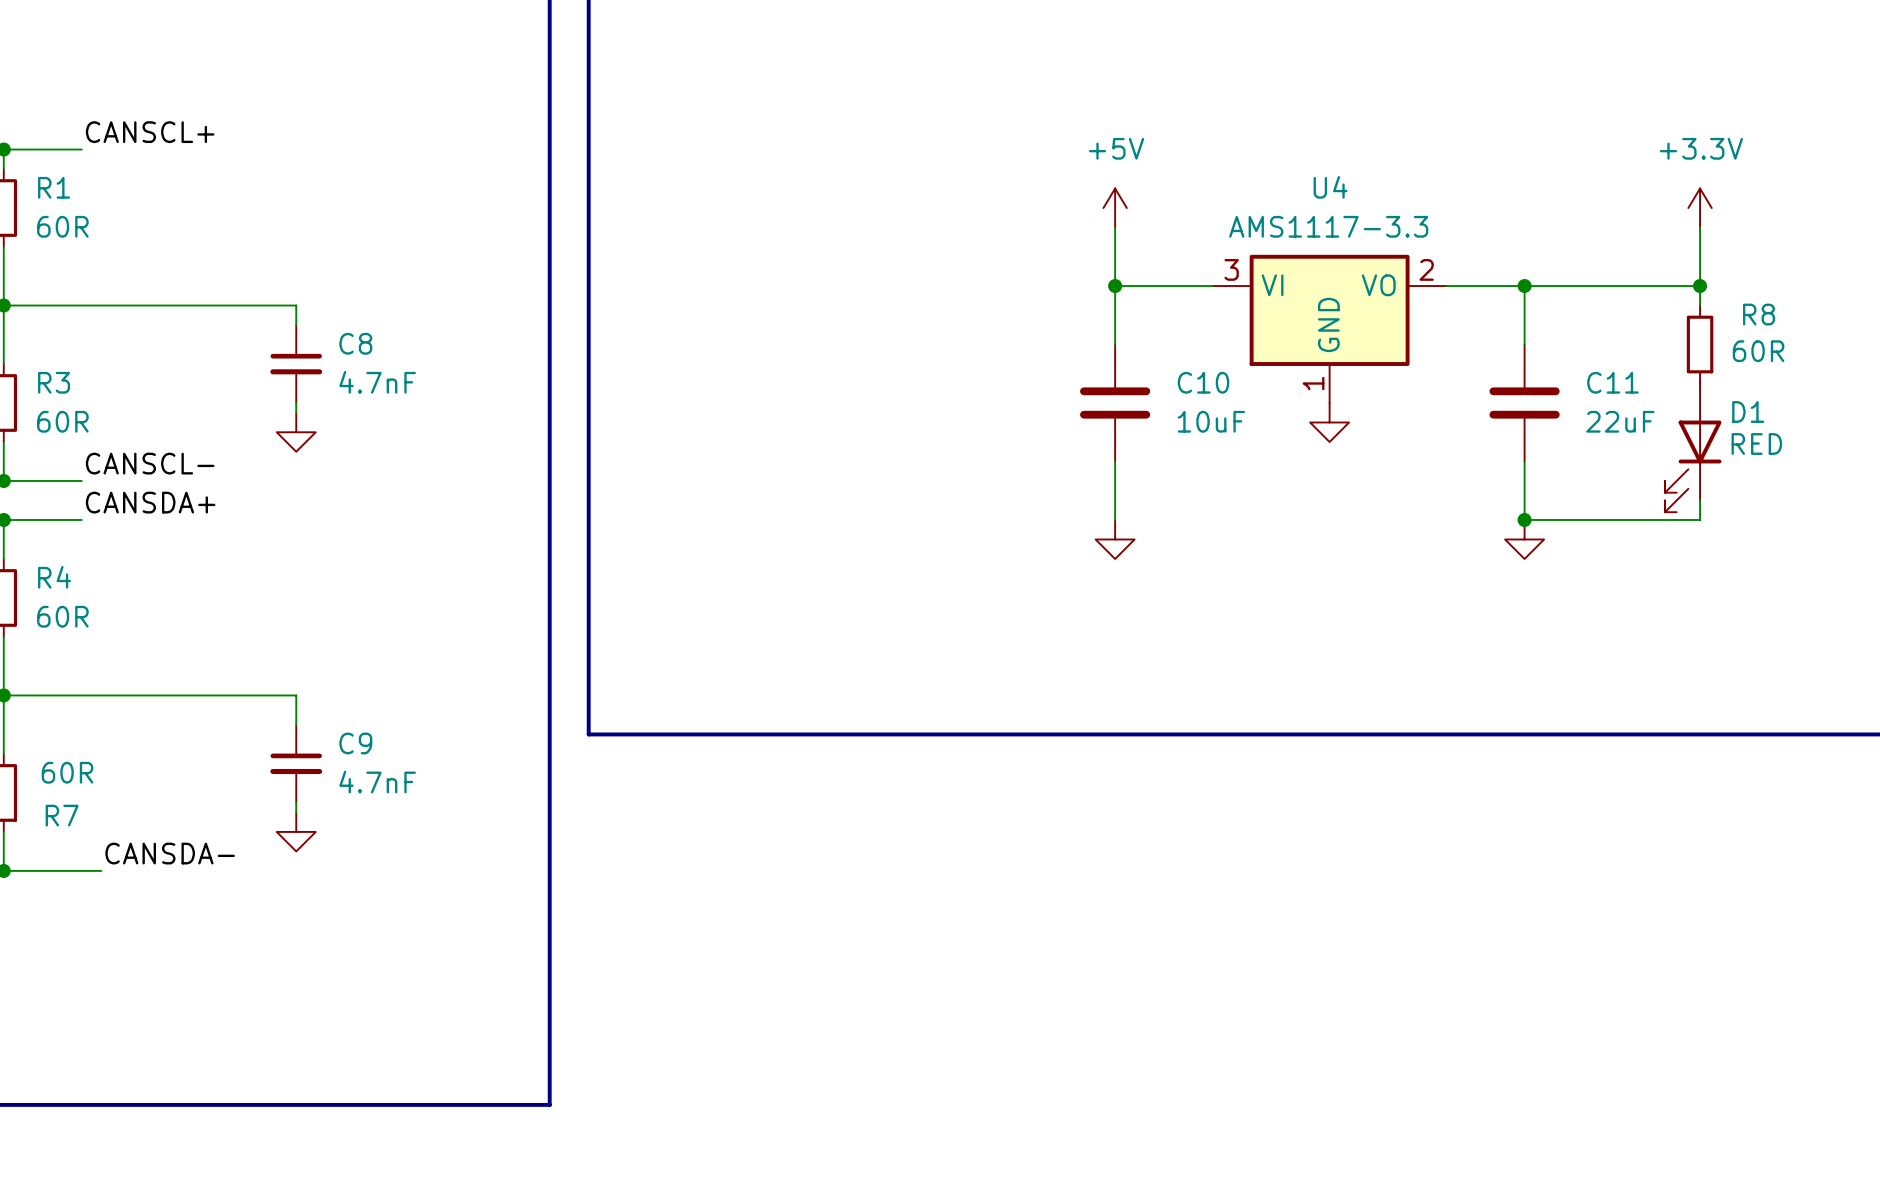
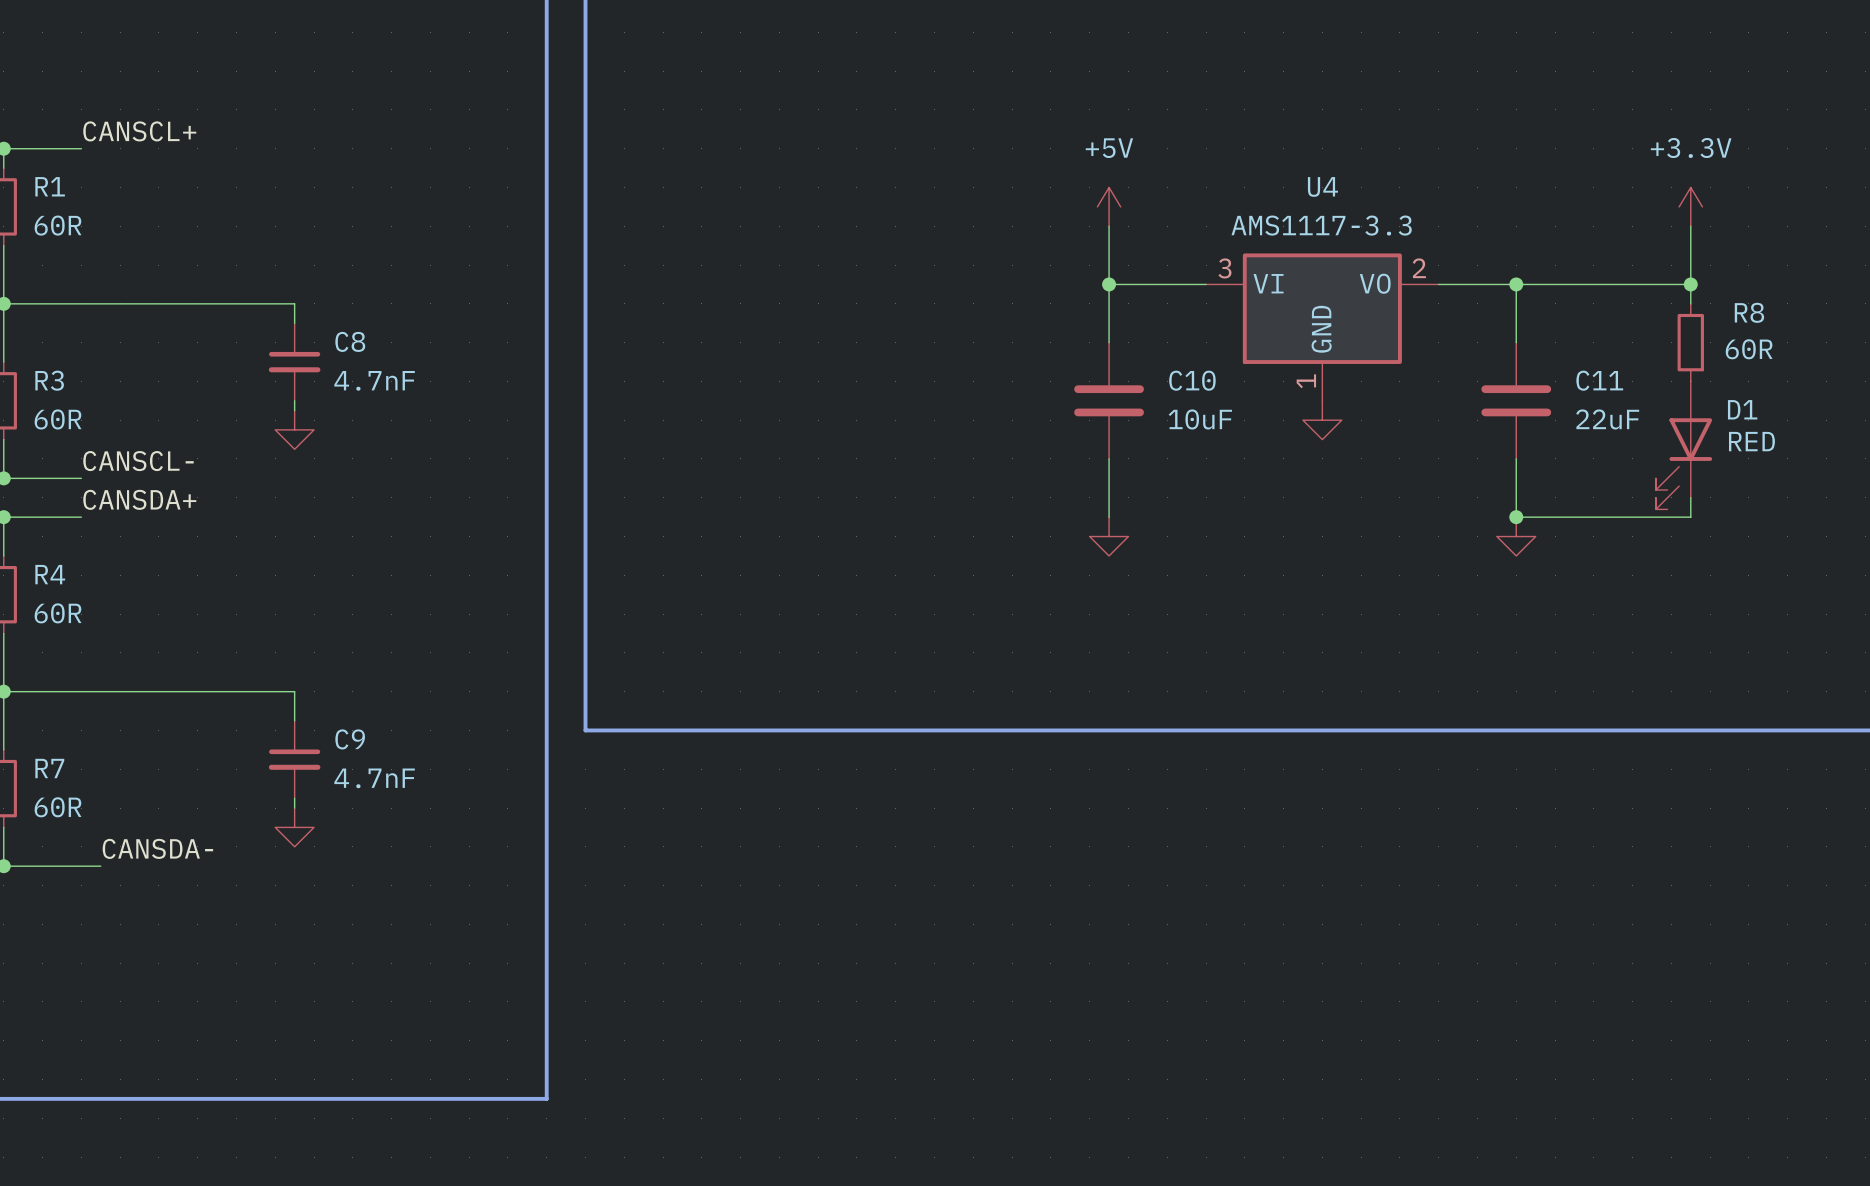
R7 value position: 60R (67, 772) -> 60R (58, 807)
R7 name position: R7 (62, 815) -> R7 (49, 768)

